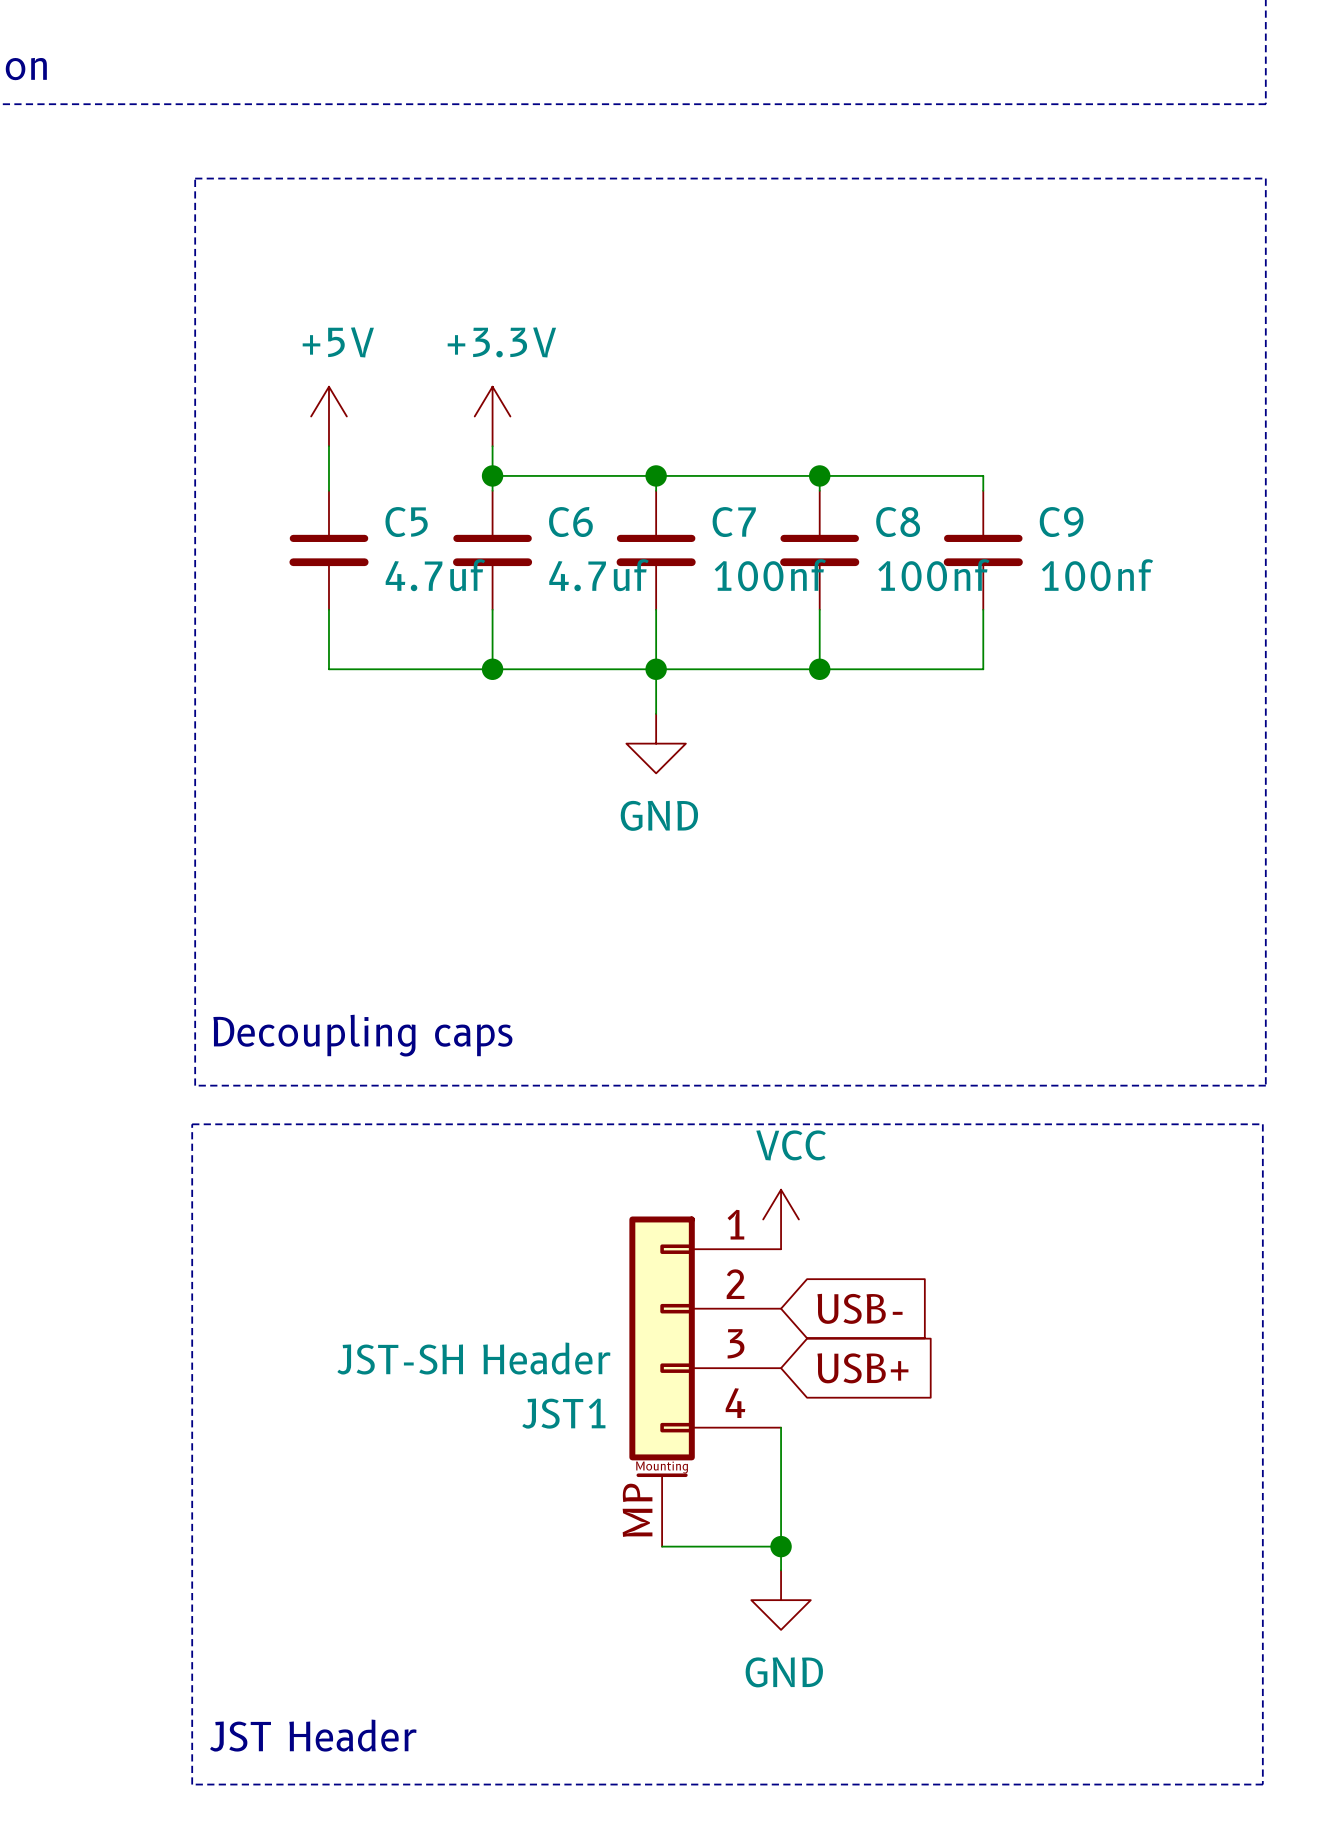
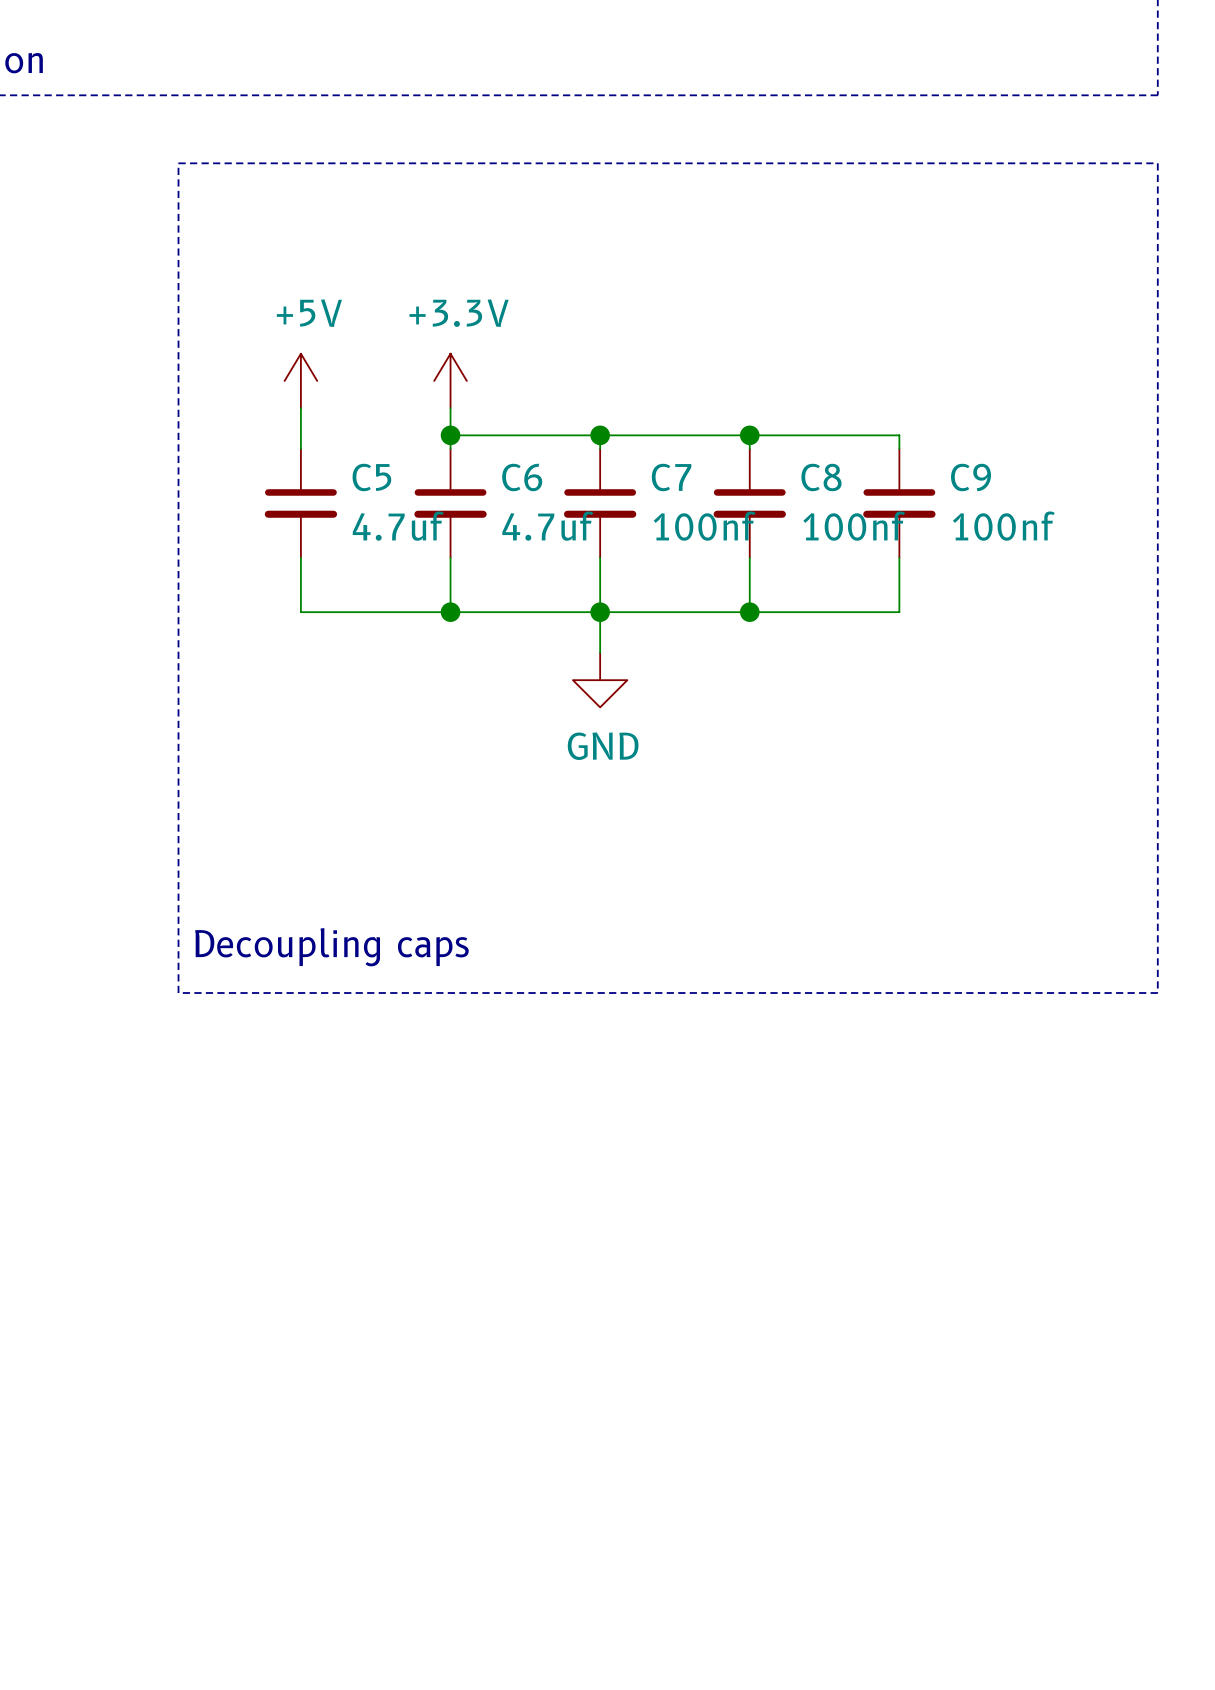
line: (192, 1124) (1262, 1124) (1262, 1784) (192, 1784) (192, 1124) -> none
power symbol: VCC (781, 1219) -> none
global label: USB- (859, 1308) -> none
global label: USB+ (862, 1368) -> none
JST1: JST-SH Header (705, 1381) -> none
wire: (781, 1427) (781, 1570) -> none
wire: (662, 1546) (781, 1546) -> none
junction: (781, 1546) -> none
power symbol: GND (781, 1600) -> none
text: JST Header (313, 1735) -> none

